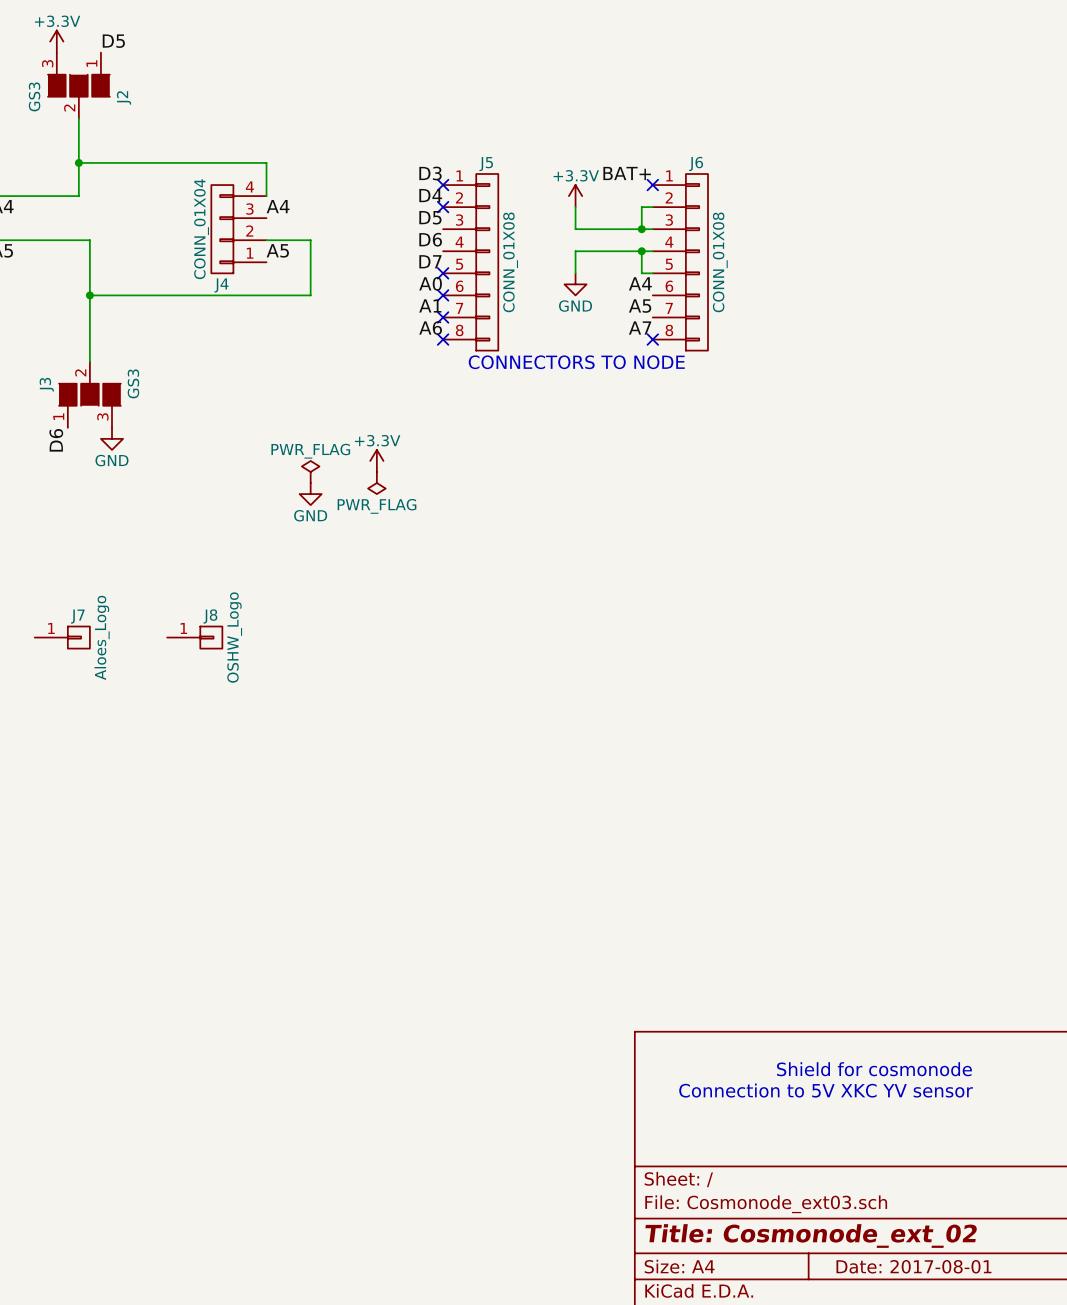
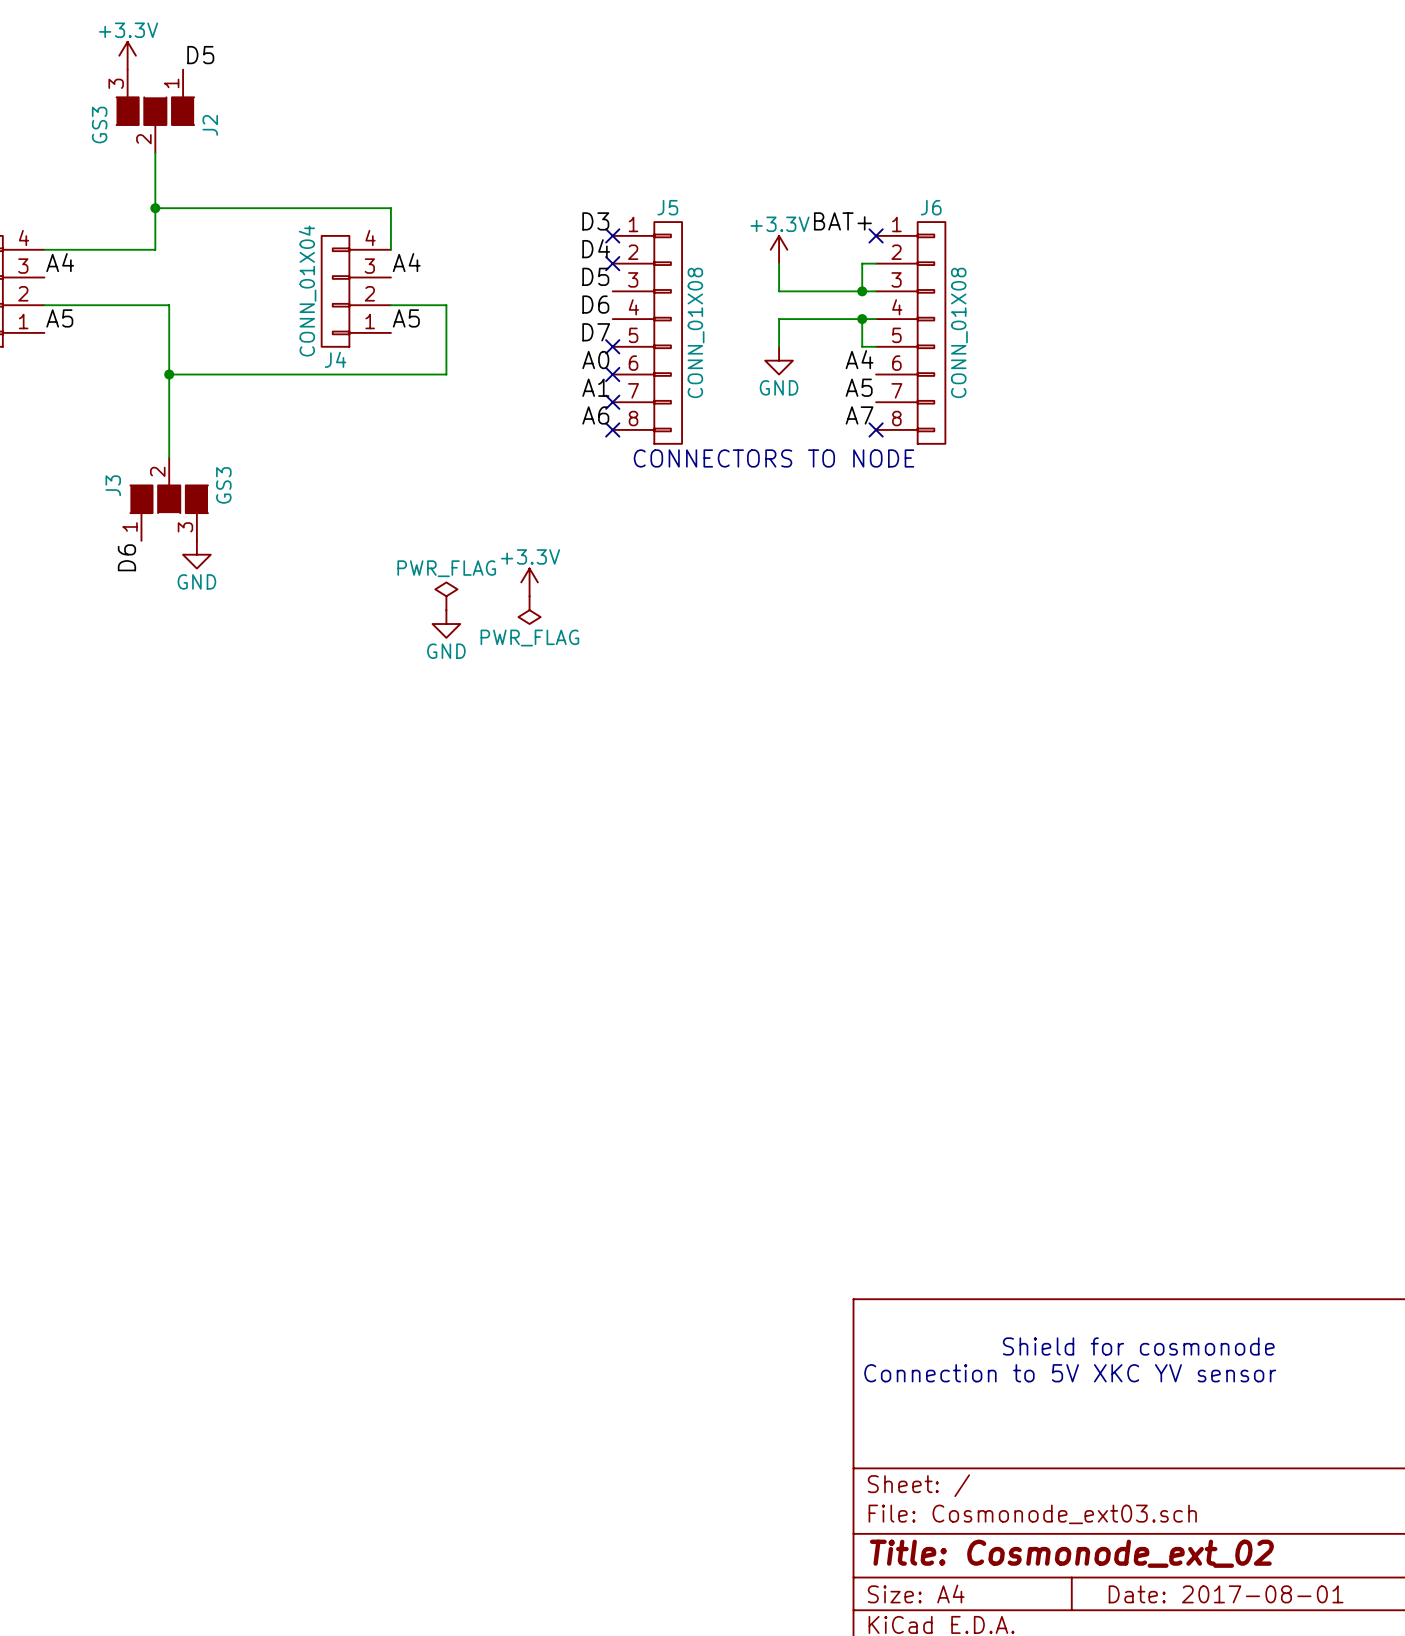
J7: Aloes_Logo (62, 637) -> none
J8: OSHW_Logo (194, 637) -> none

